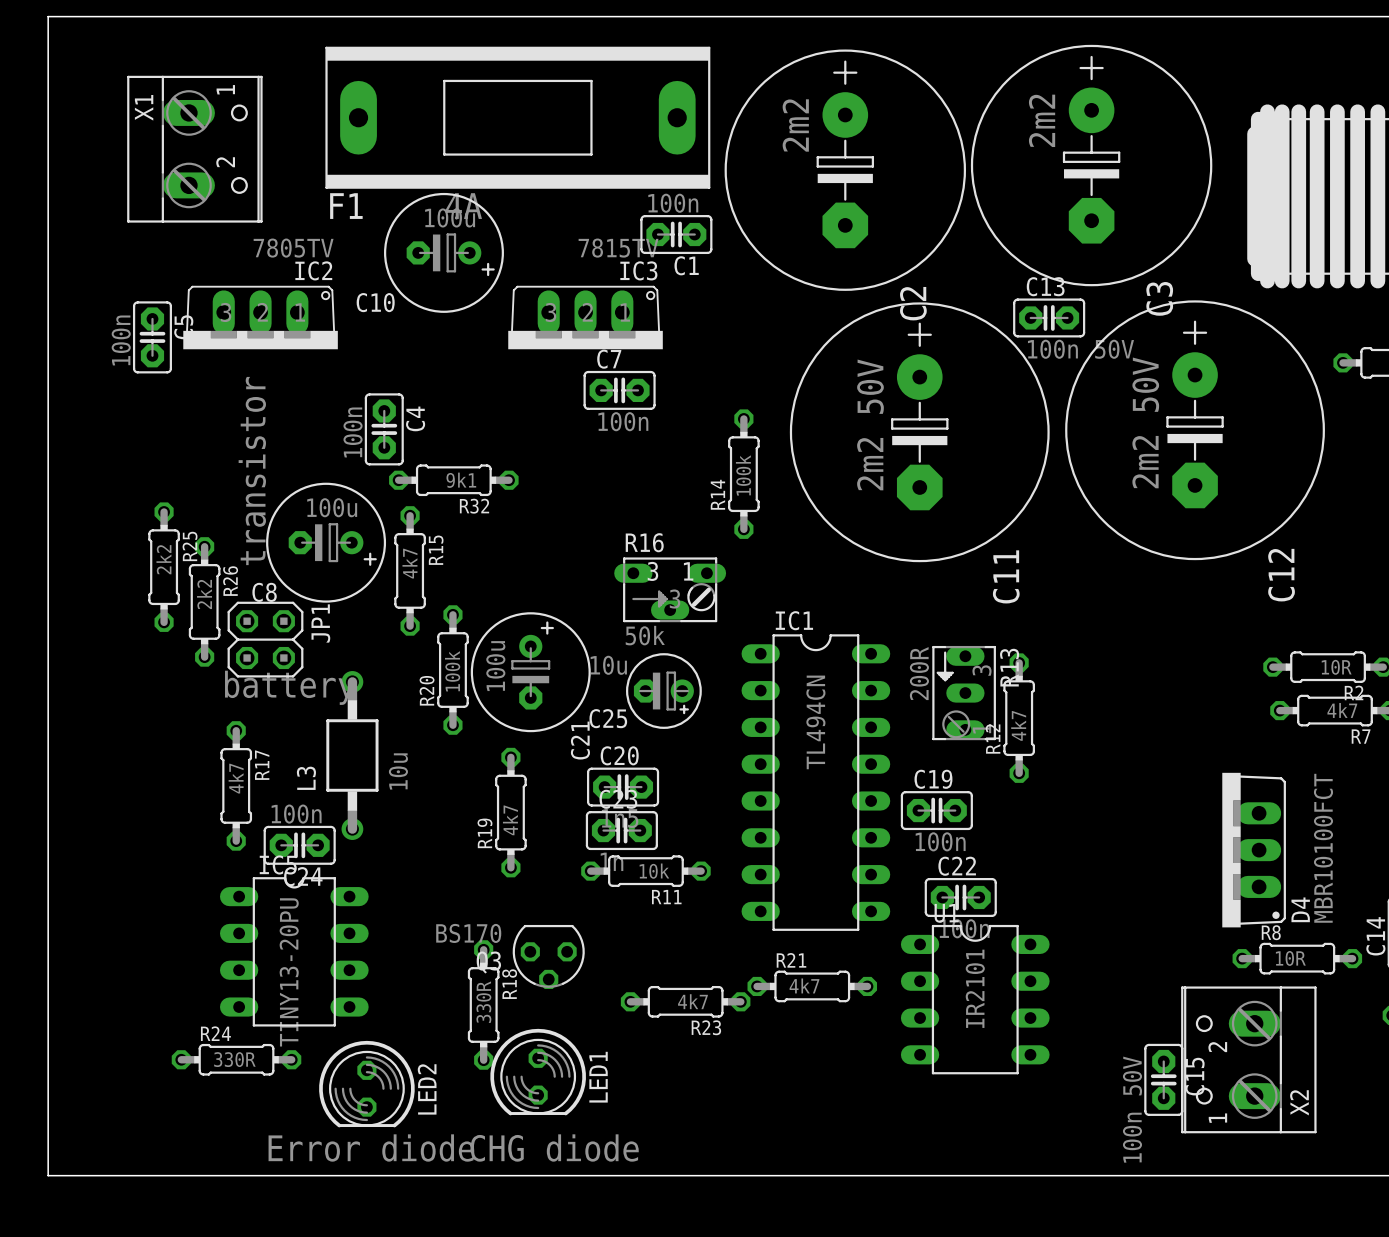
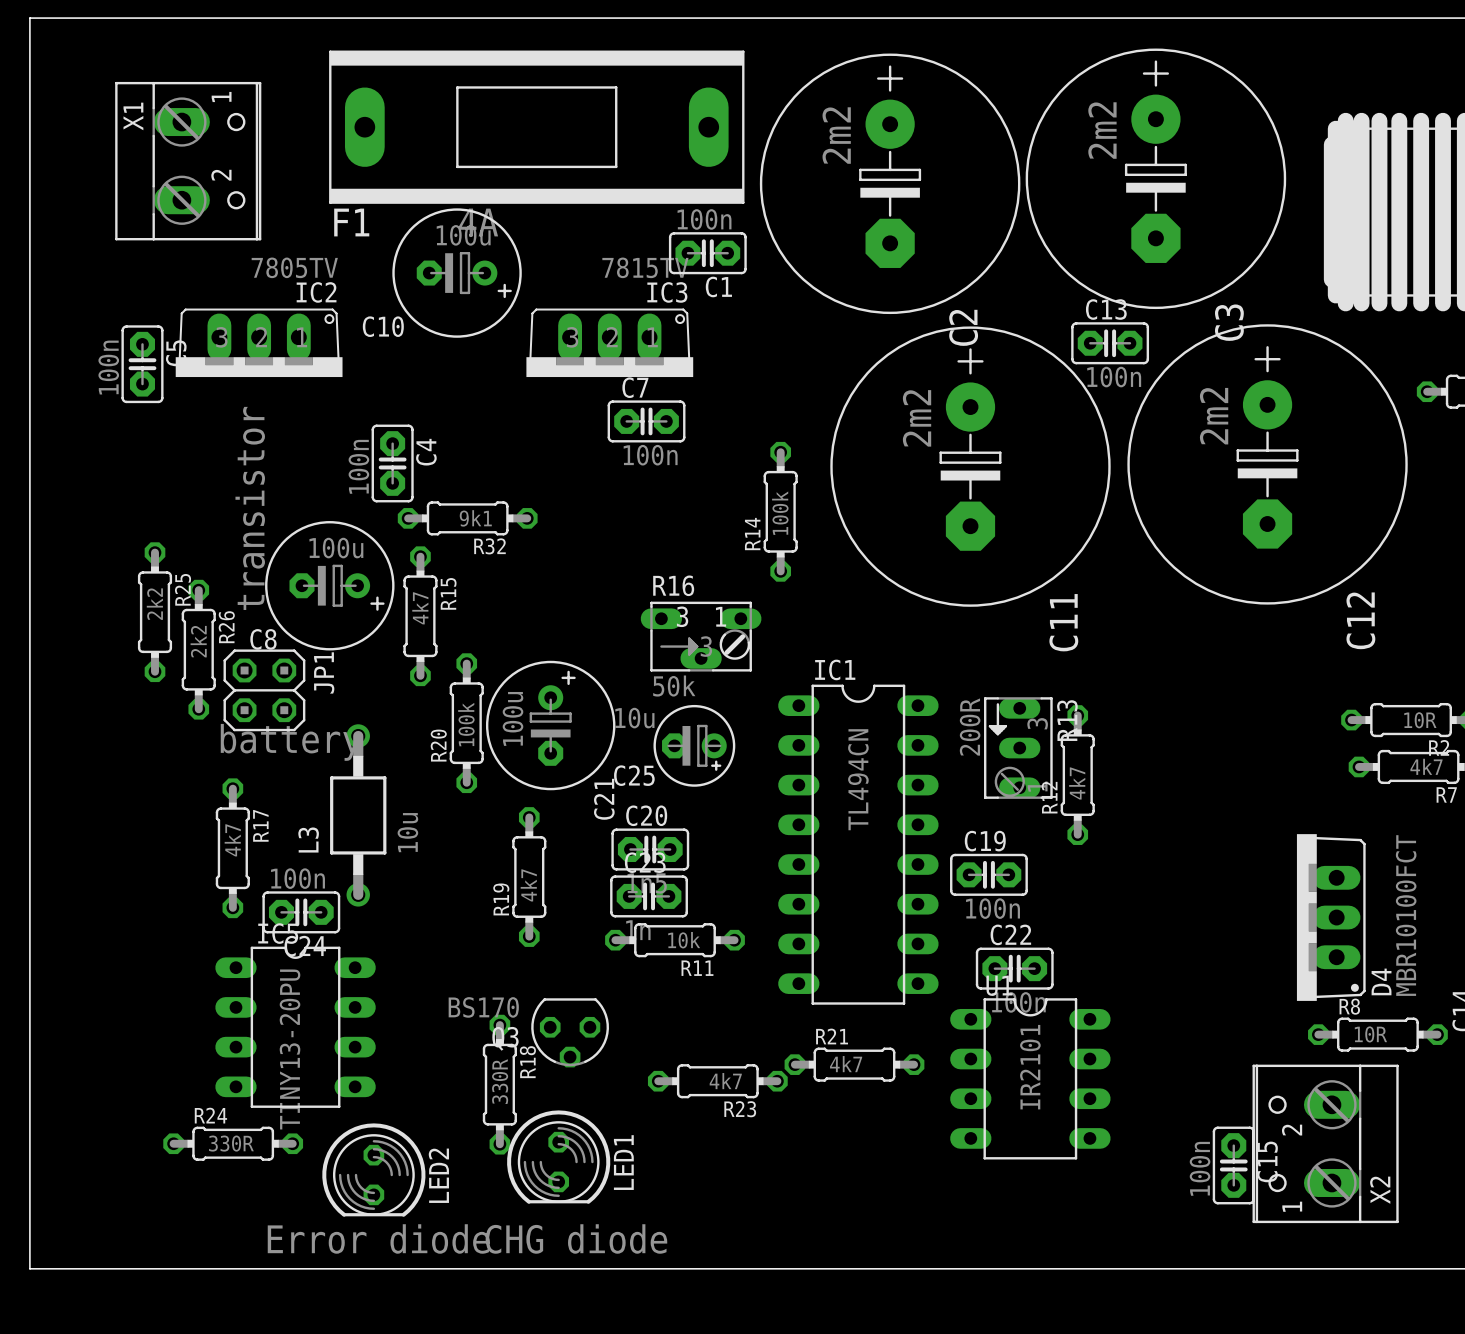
C13 value: 100n 50V (1080, 349) -> 100n (1114, 377)
C12 value: 2m2 50V (1145, 422) -> 2m2 (1214, 416)
C11 value: 2m2 50V (870, 424) -> 2m2 (917, 418)
C15 value: 100n 50V (1132, 1109) -> 100n (1200, 1168)

